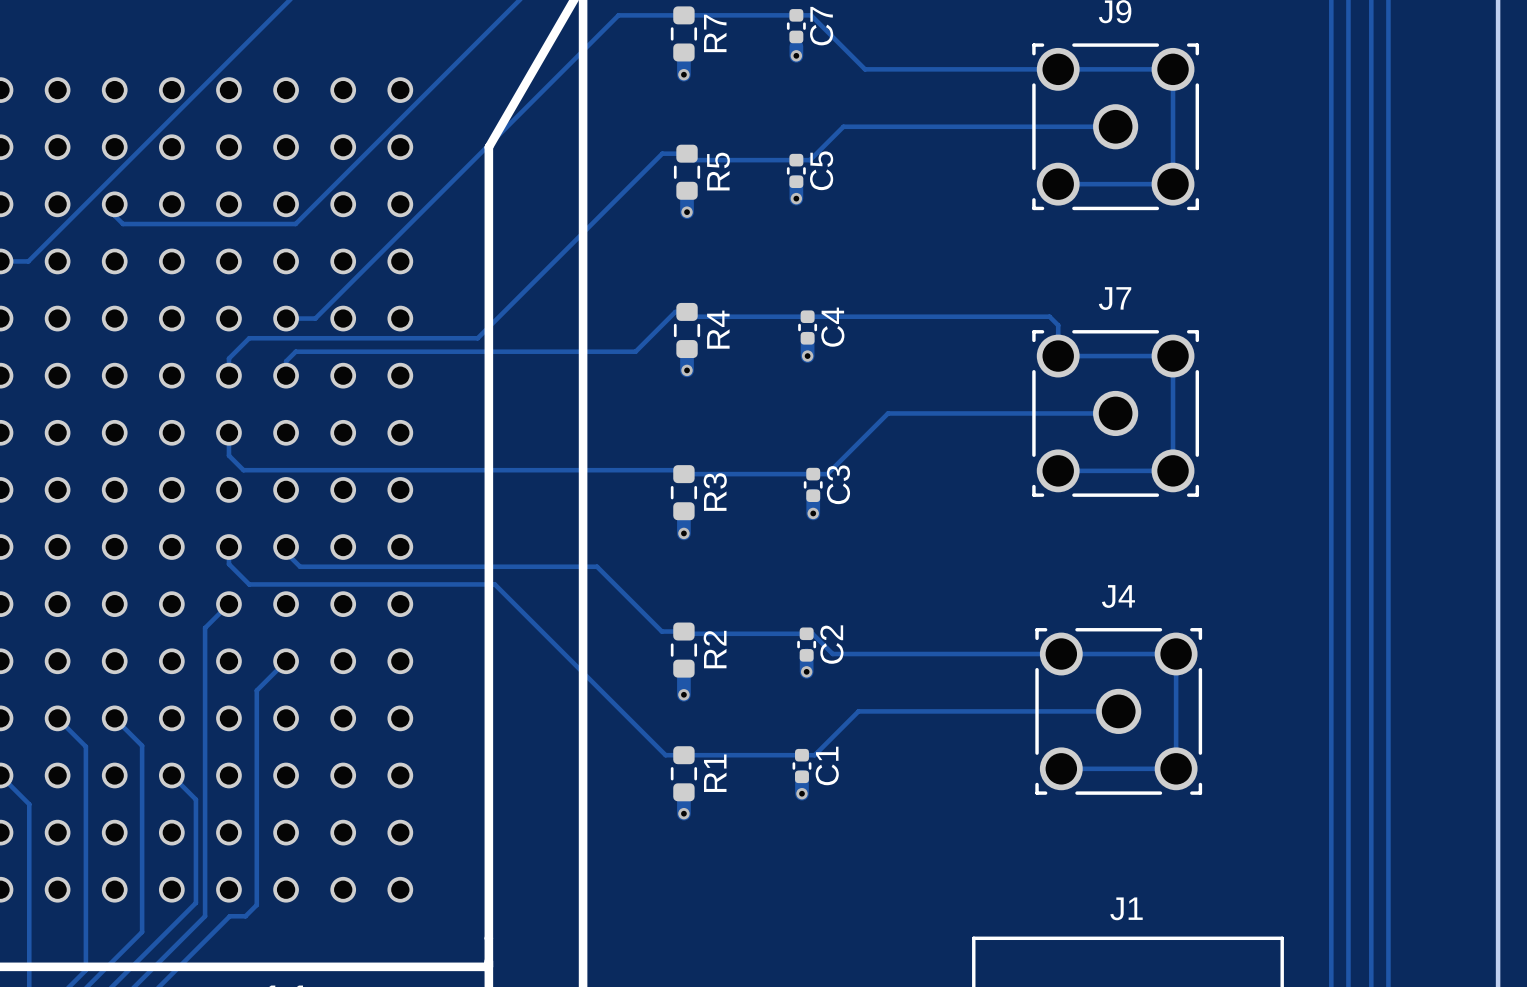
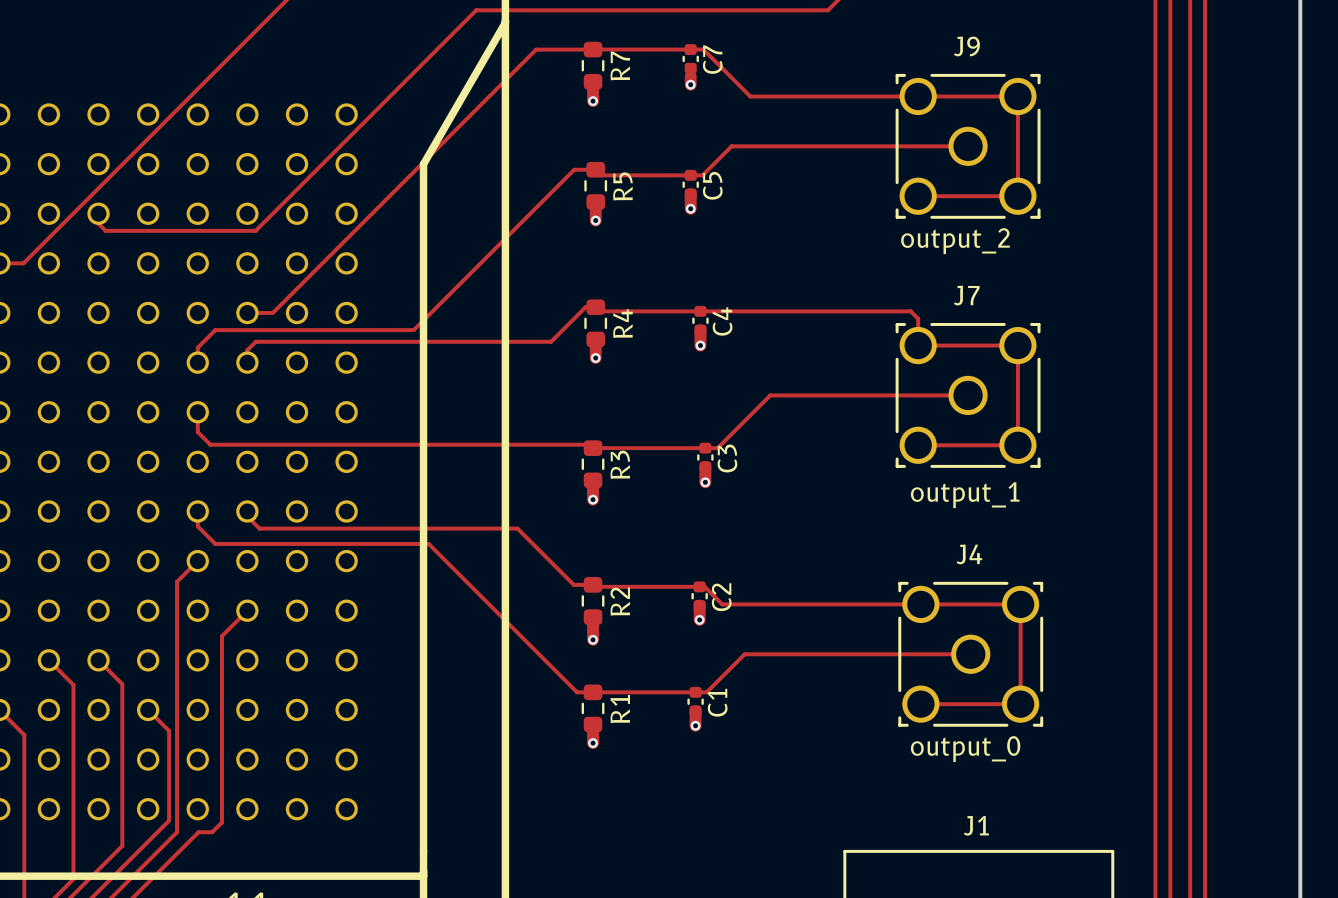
text: none -> output_2 (955, 241)
text: none -> output_1 (965, 495)
text: none -> output_0 (965, 749)

